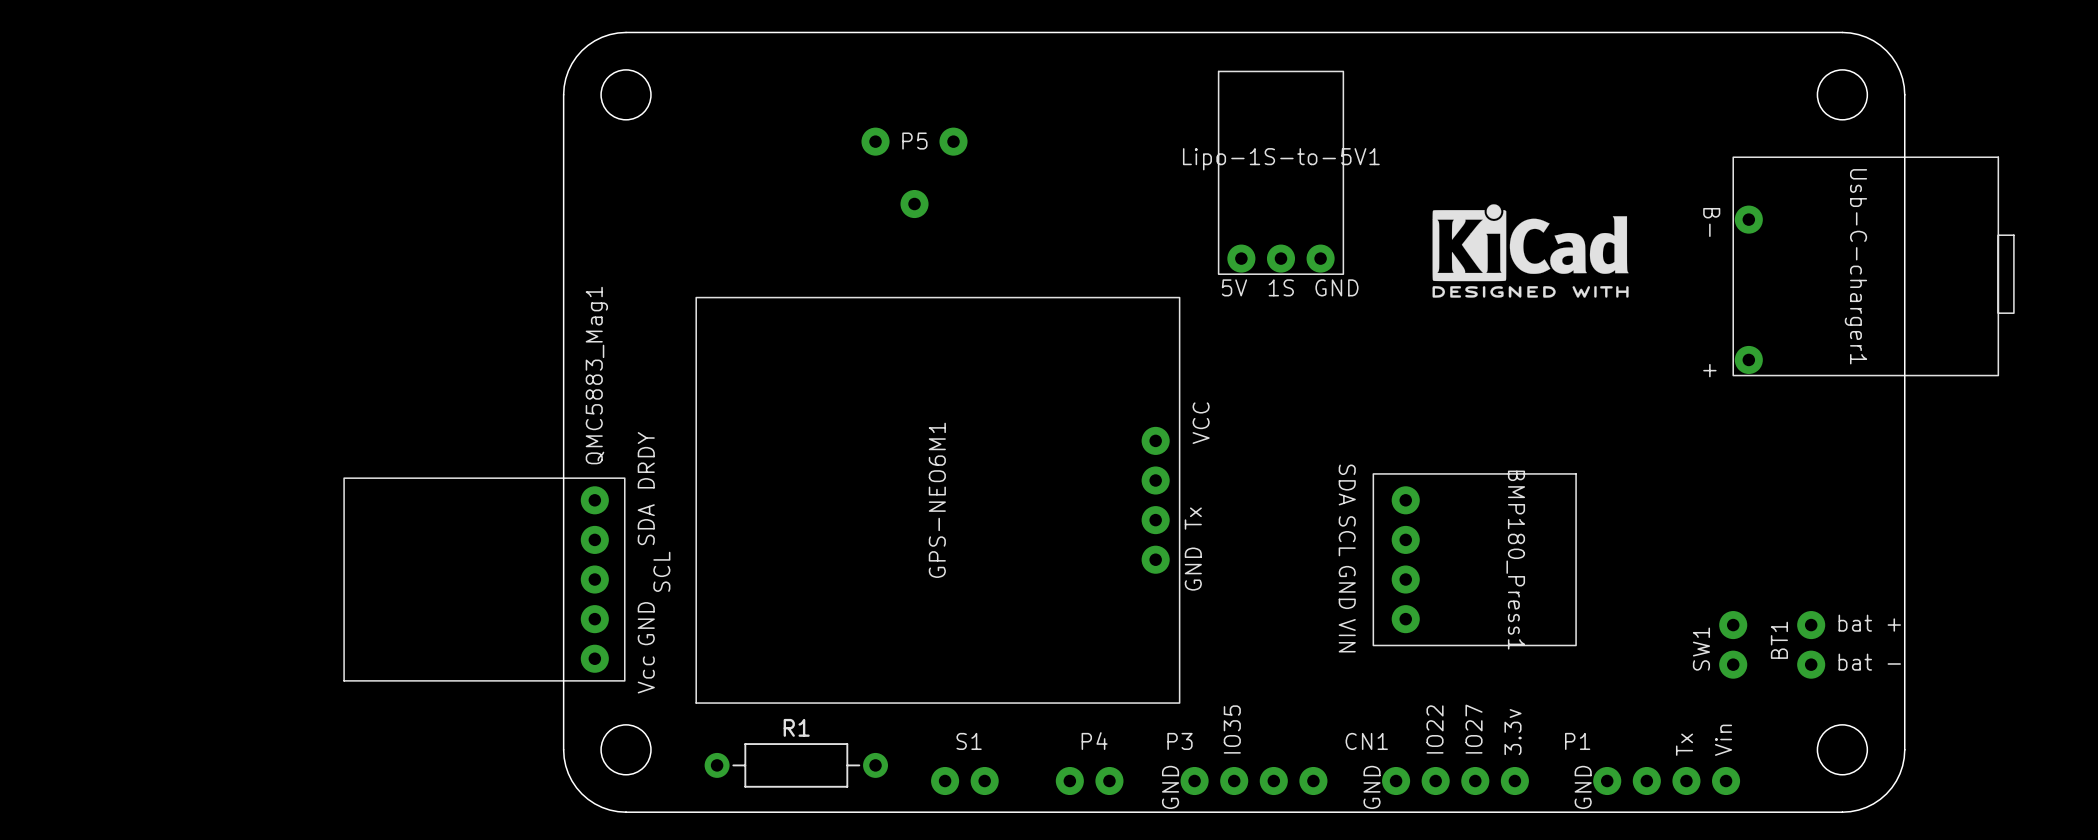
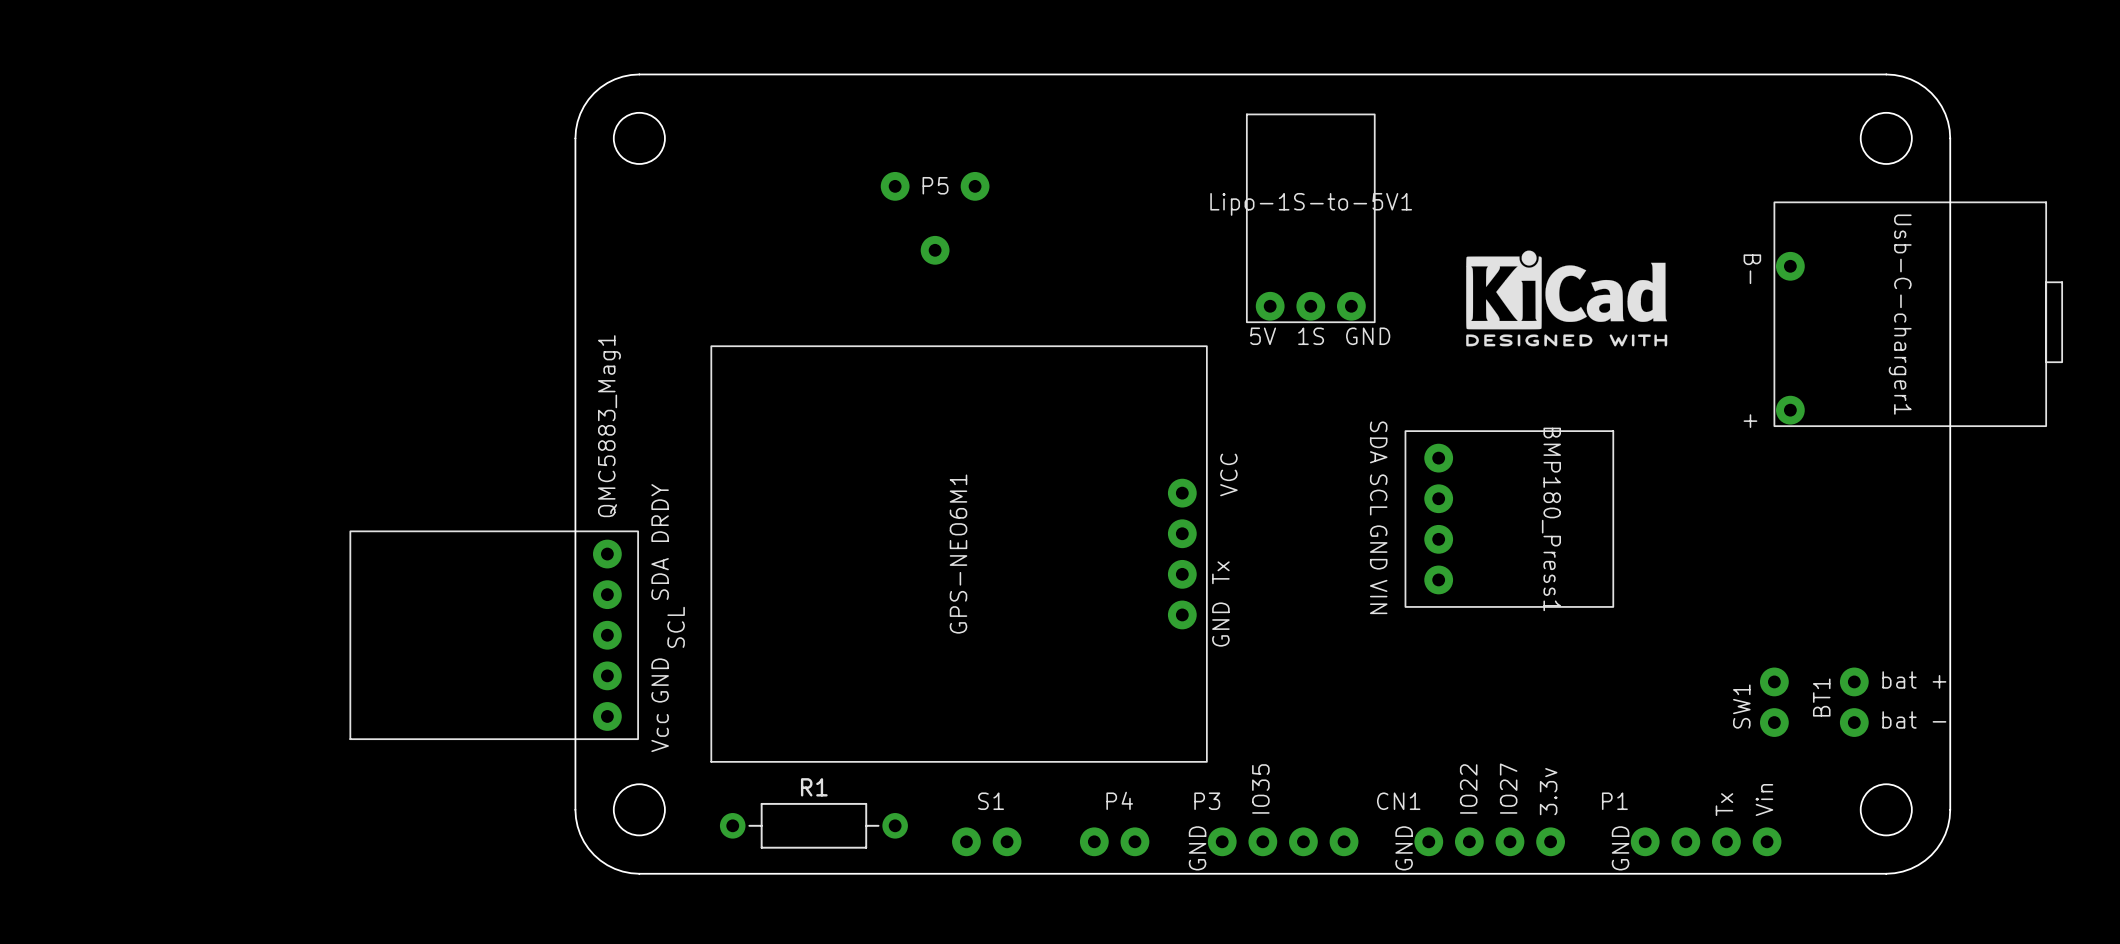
BMP180_Press1 position: (1474, 559) -> (1509, 519)

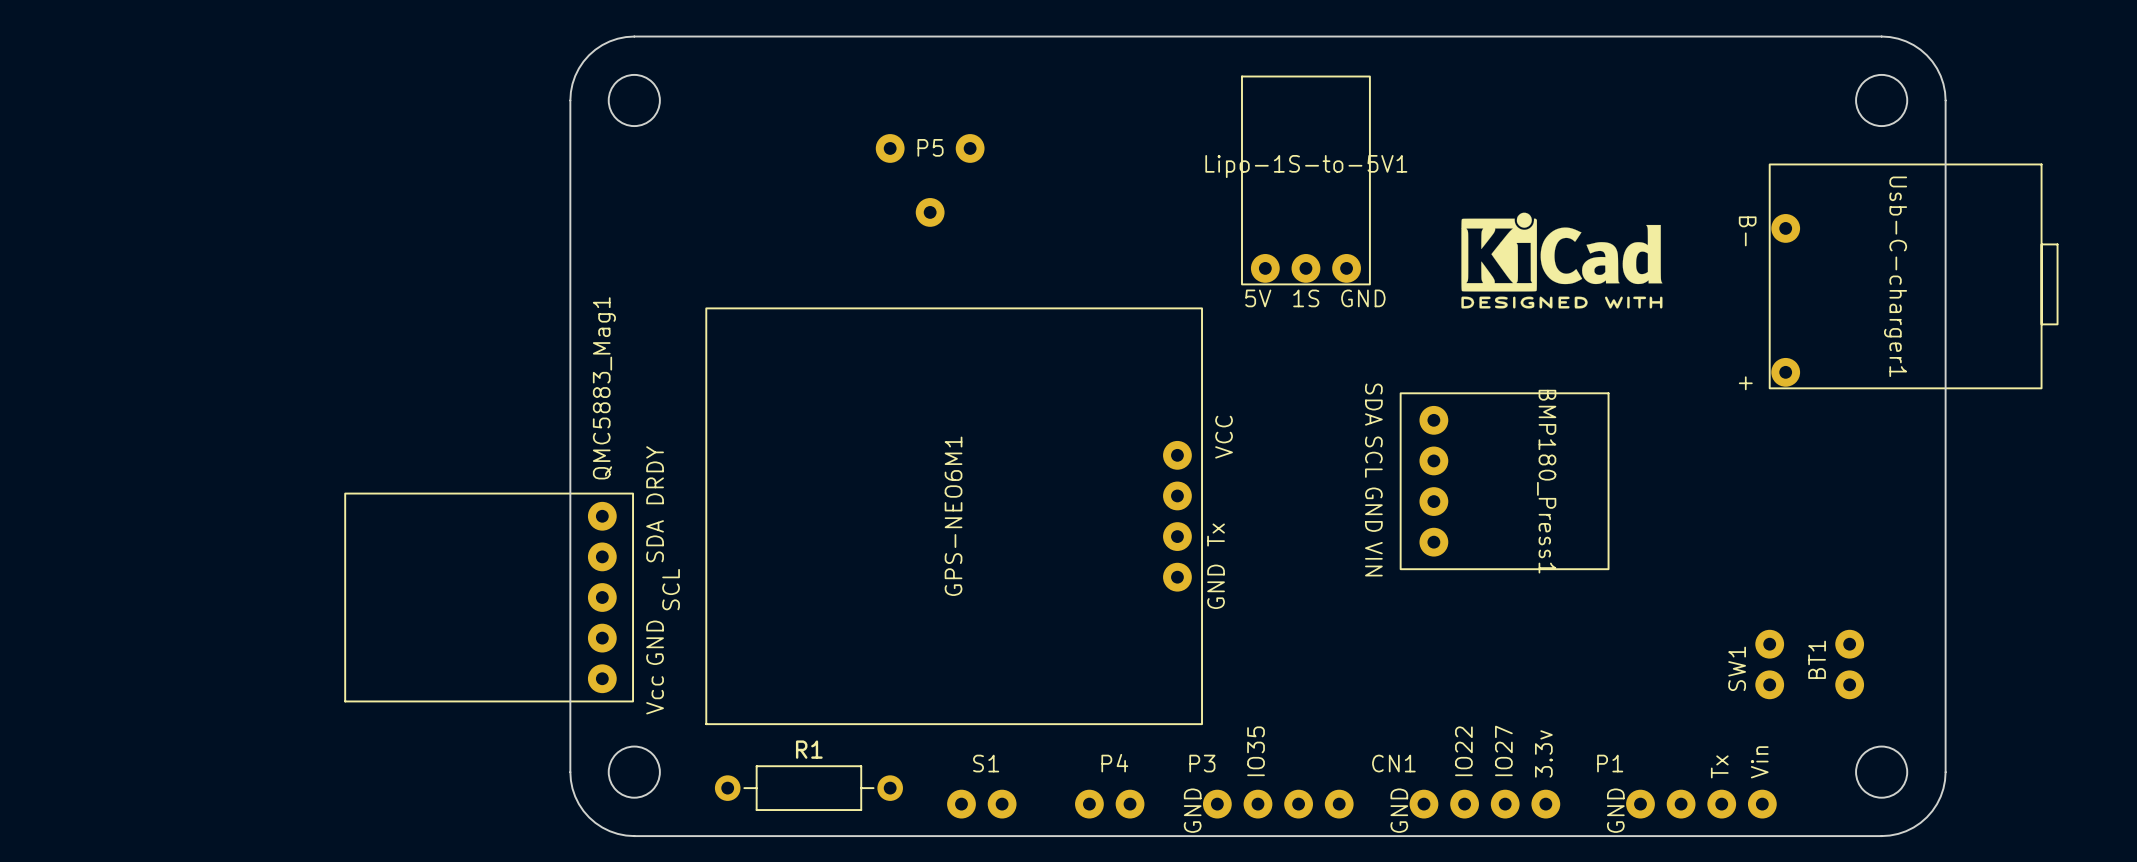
text: bat + (1914, 679) -> none
text: bat - (1914, 719) -> none

